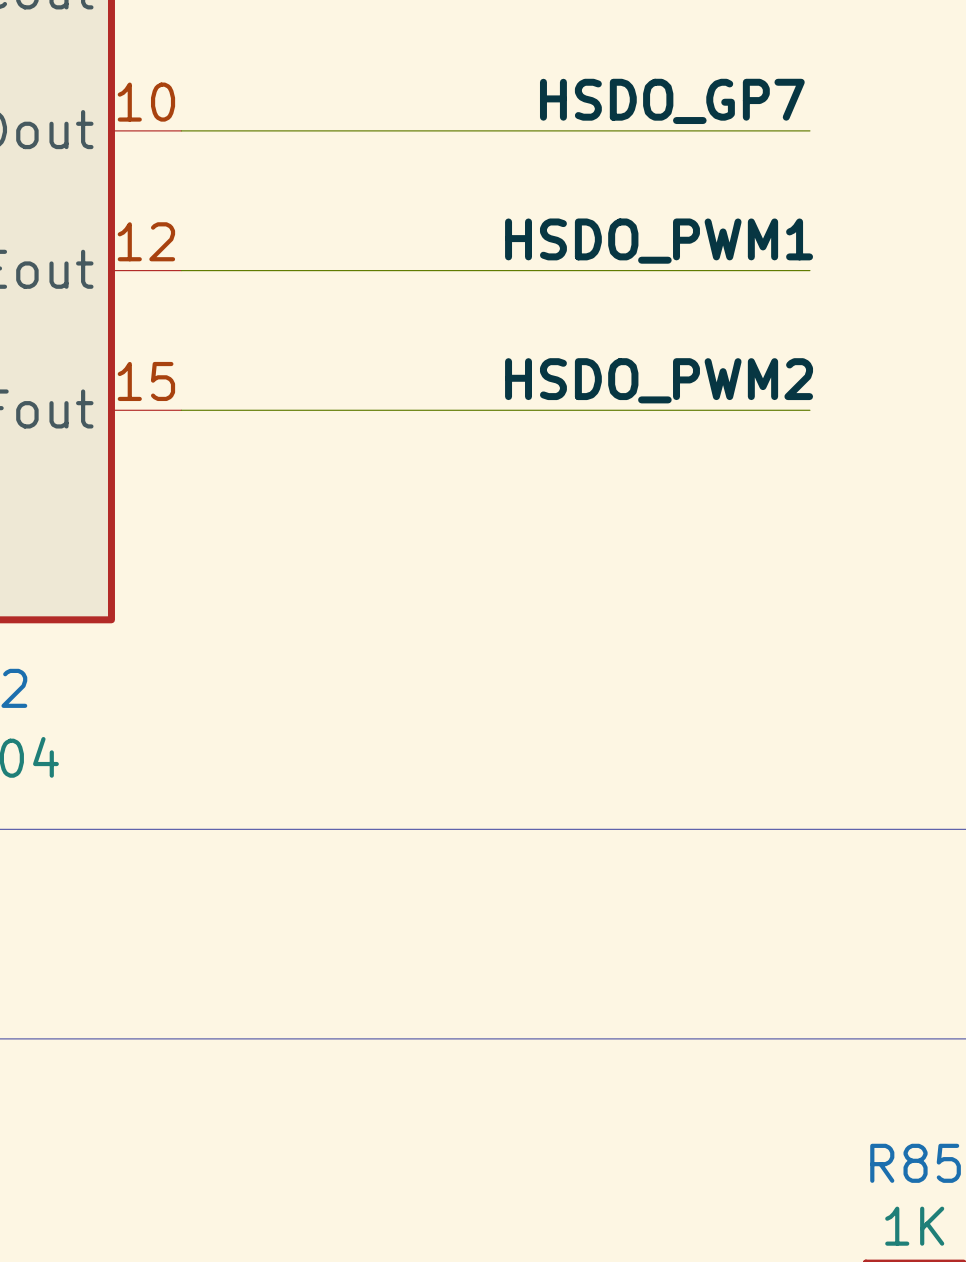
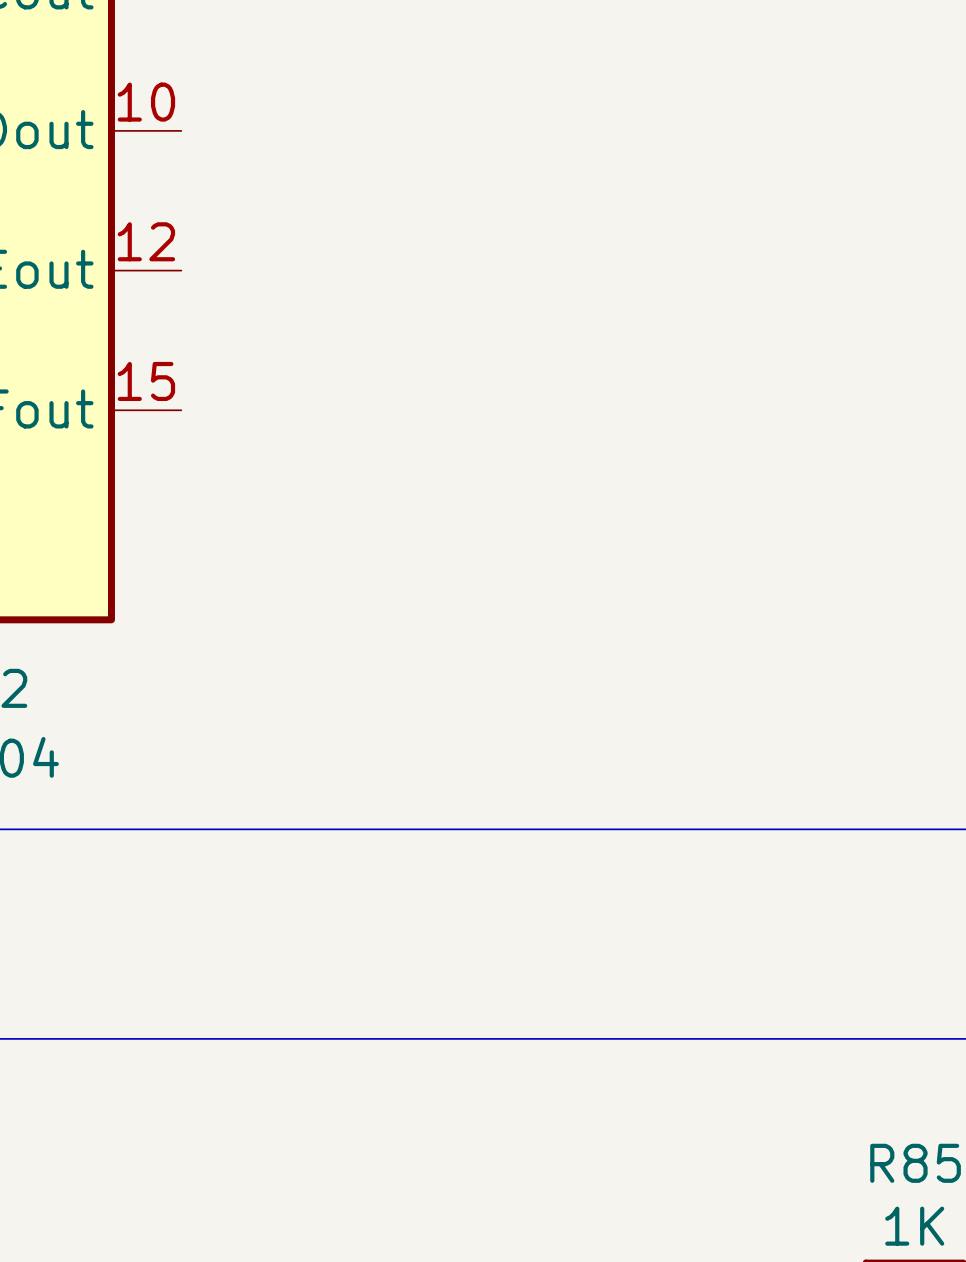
label: HSDO_GP7 (672, 101) -> none
wire: (181, 130) (809, 130) -> none
label: HSDO_PWM1 (659, 241) -> none
wire: (181, 270) (809, 270) -> none
label: HSDO_PWM2 (659, 380) -> none
wire: (181, 410) (809, 410) -> none

